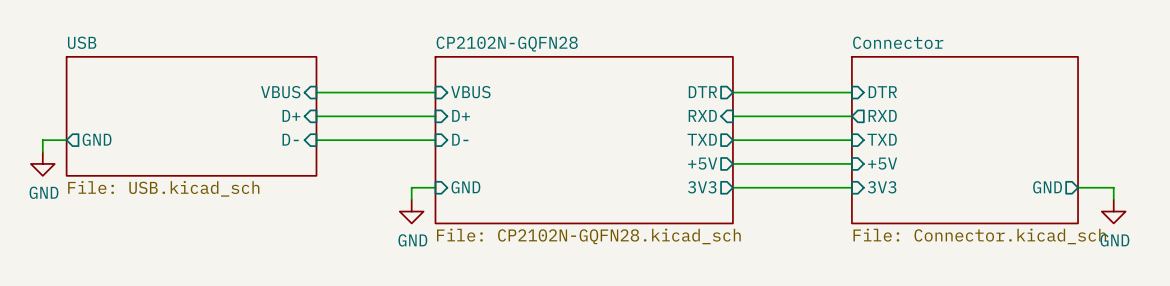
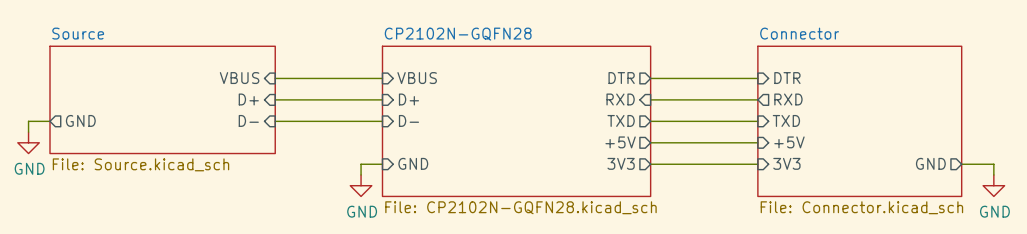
sheet USB name: USB (82, 42) -> Source (78, 33)
sheet USB value: File: USB.kicad_sch (163, 188) -> File: Source.kicad_sch (140, 164)

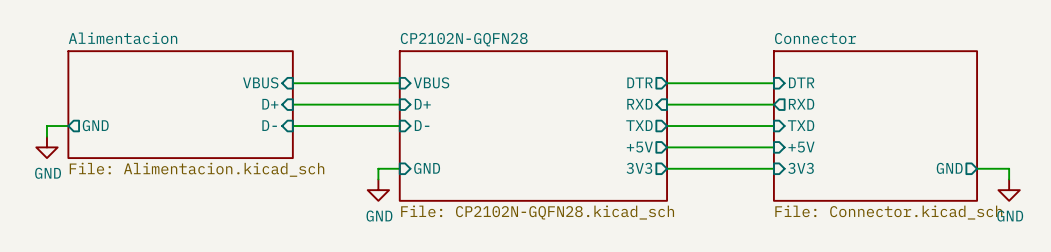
sheet Source name: Source (78, 33) -> Alimentacion (123, 38)
sheet Source value: File: Source.kicad_sch (140, 164) -> File: Alimentacion.kicad_sch (197, 169)

